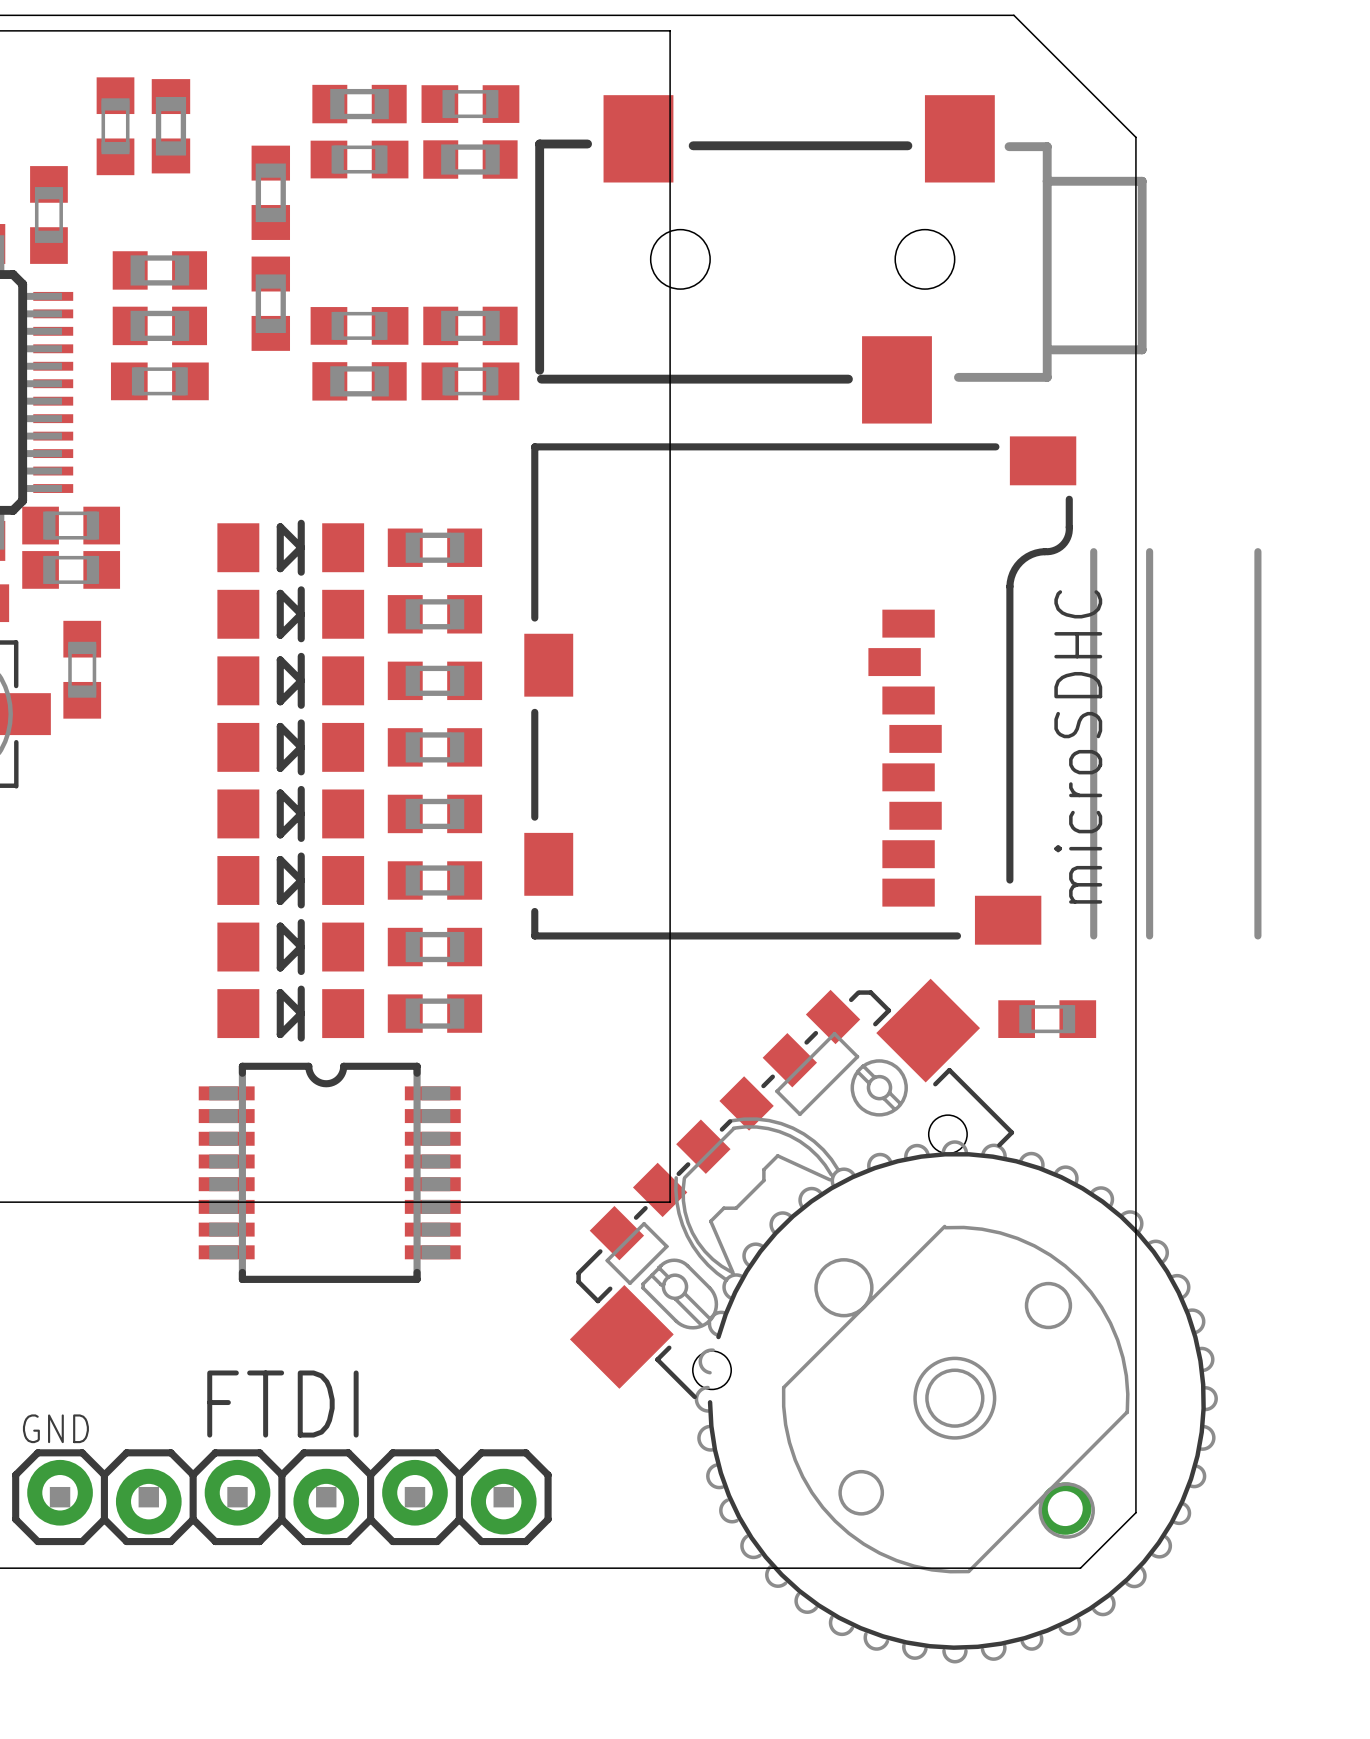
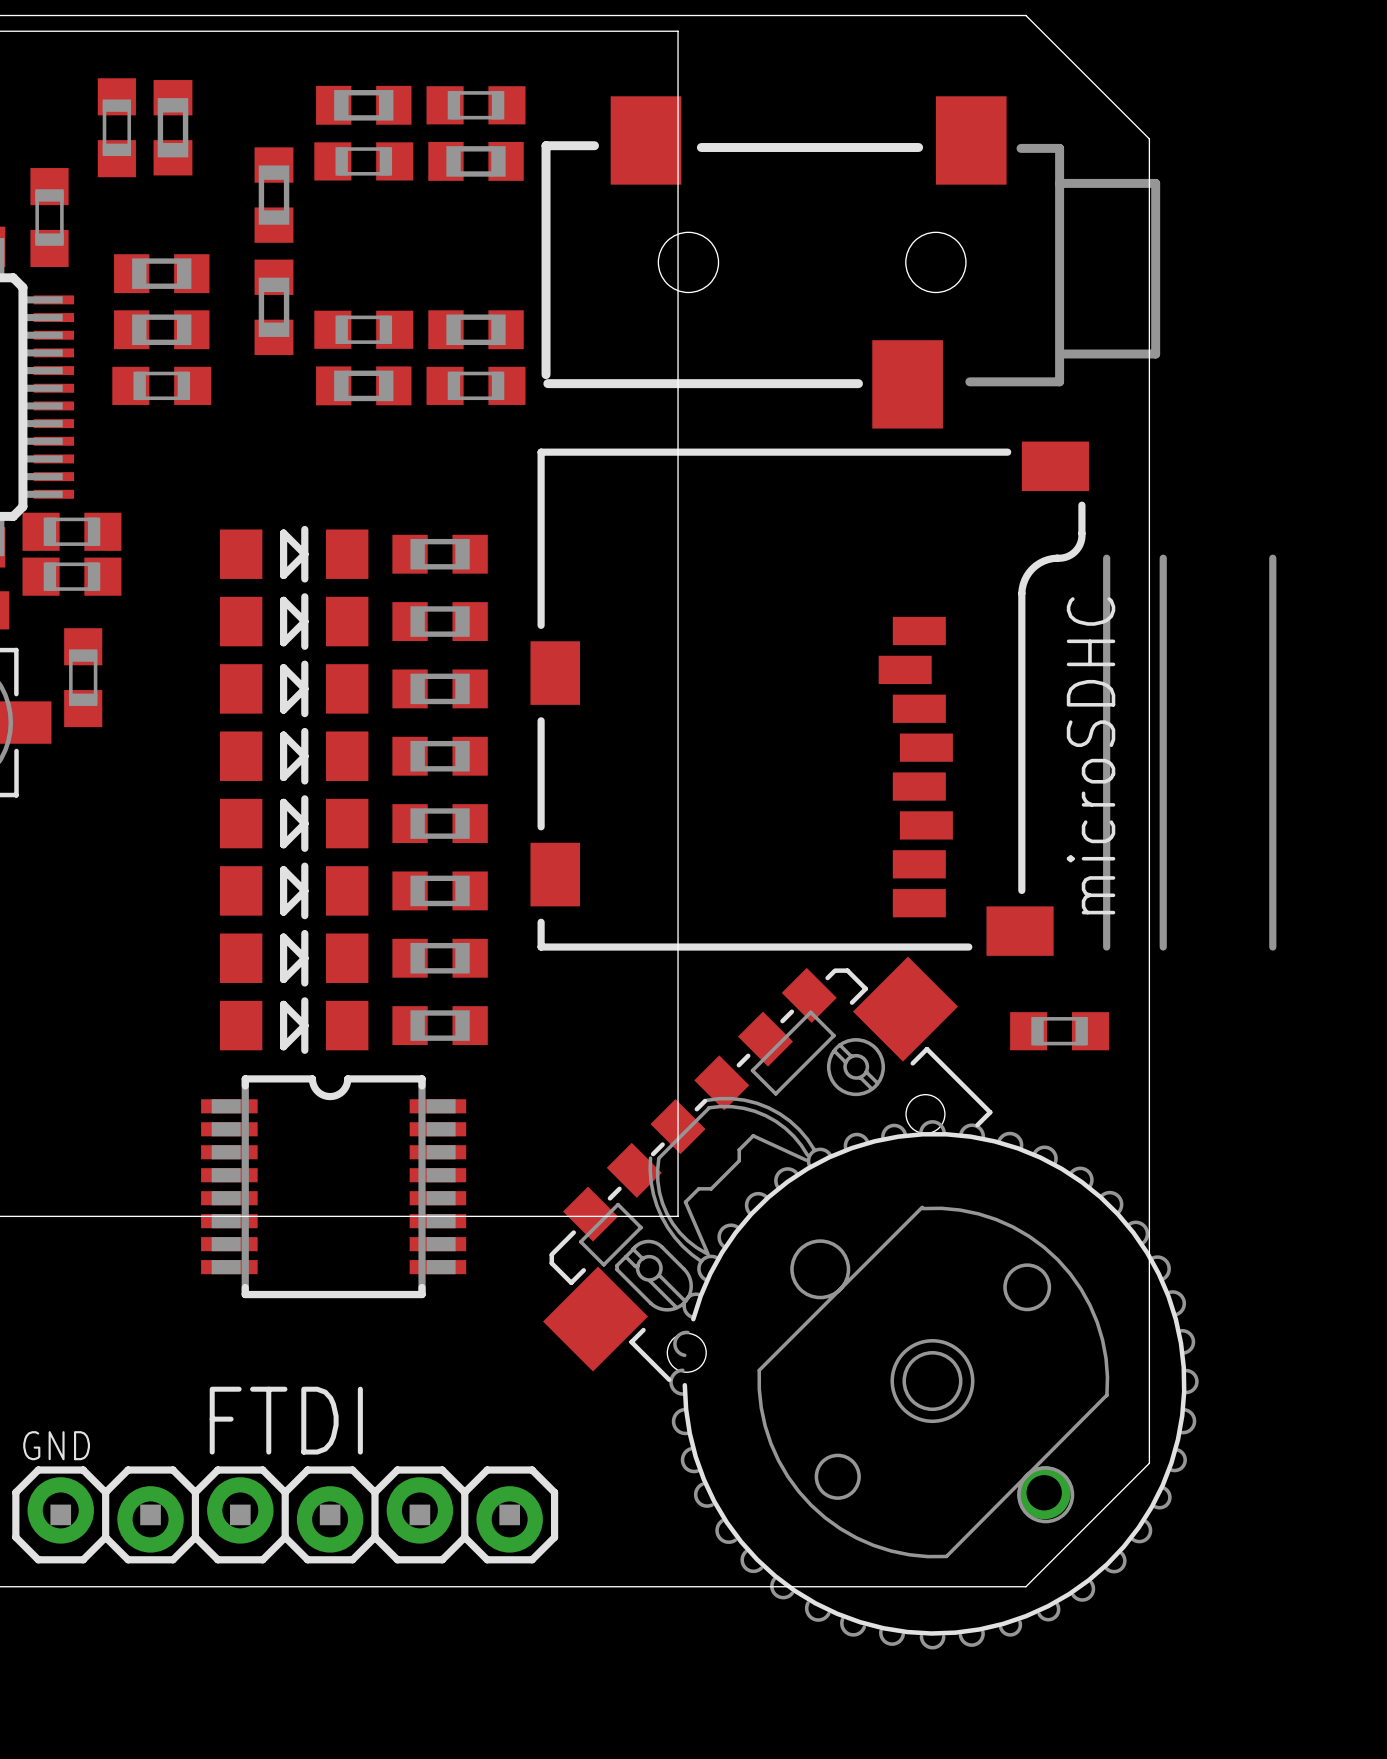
part position: (894, 1321) -> (870, 1303)
board edge: (1135, 1446) (1135, 1512) (1080, 1568) (1013, 1568) -> (1149, 1463) (1025, 1586)

